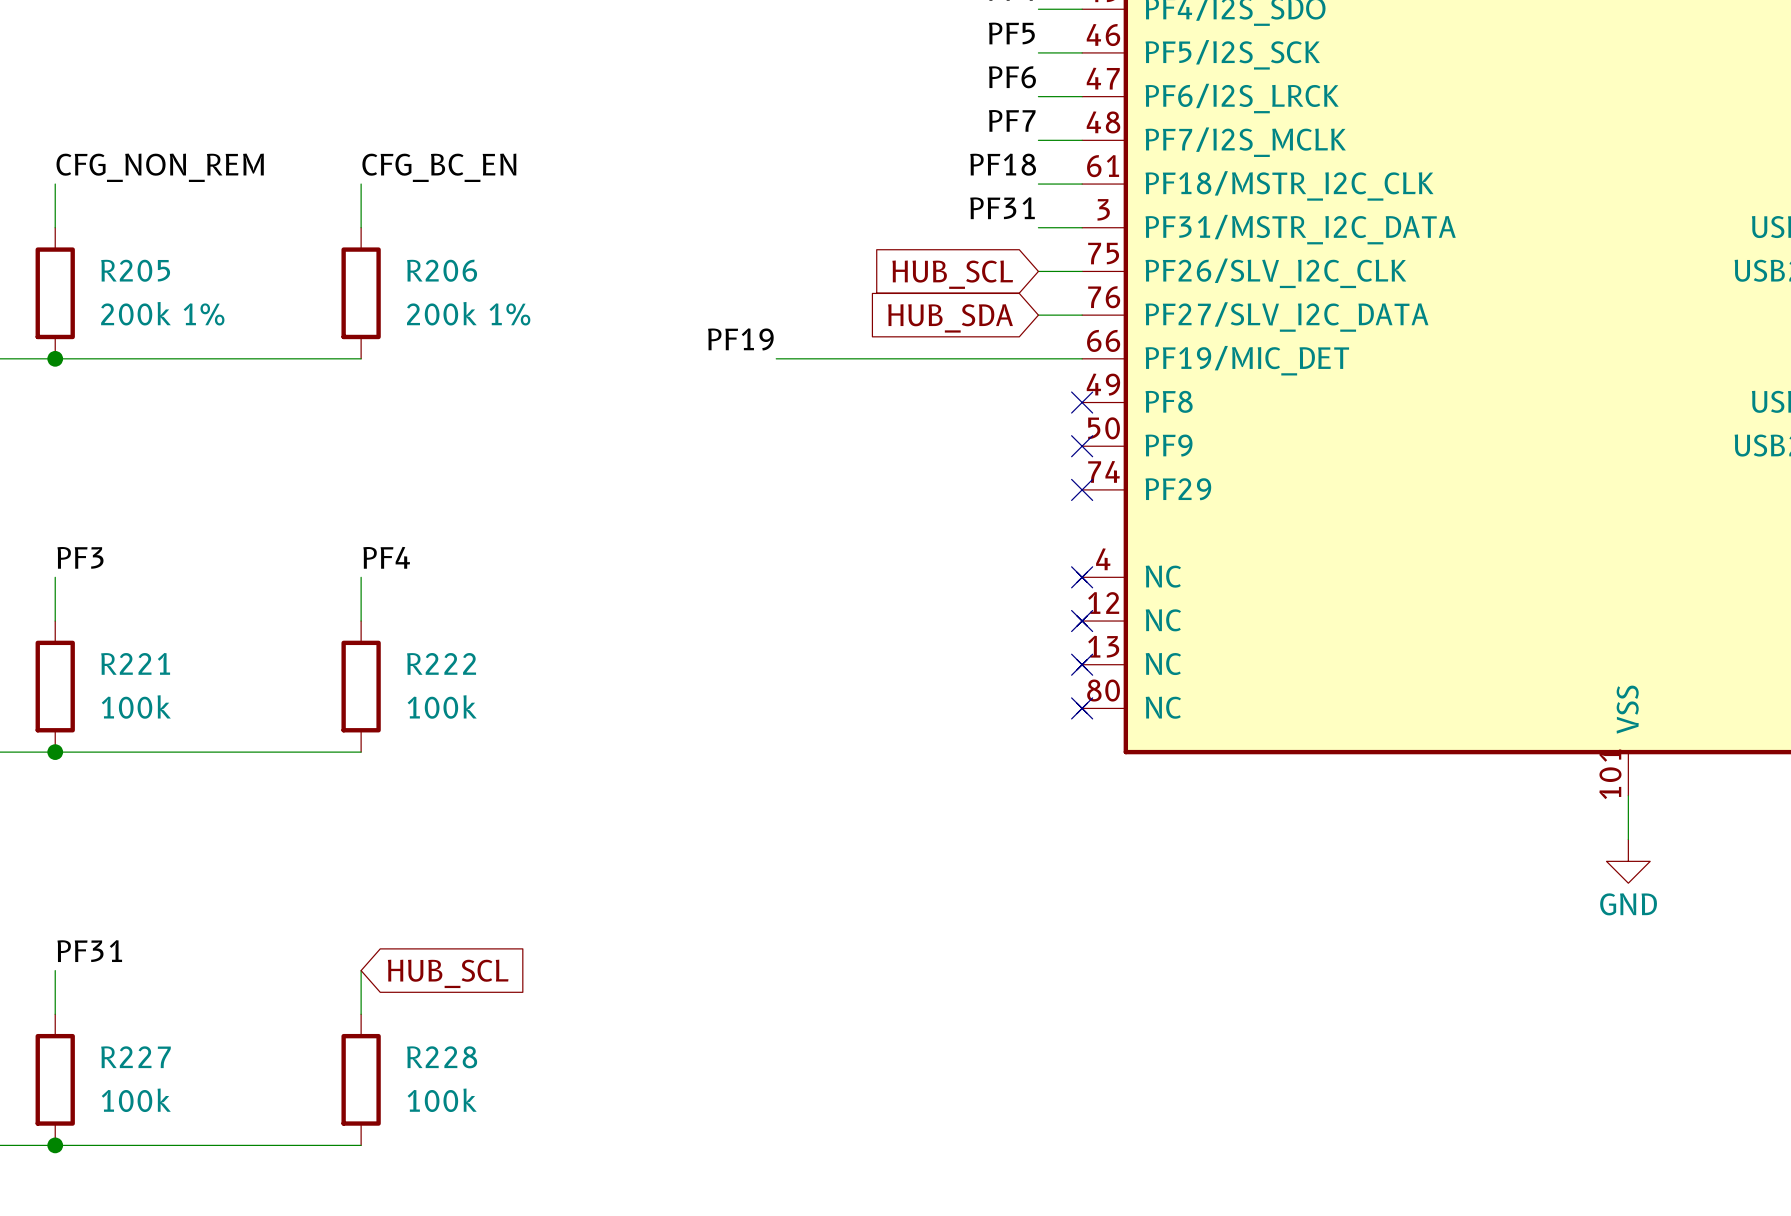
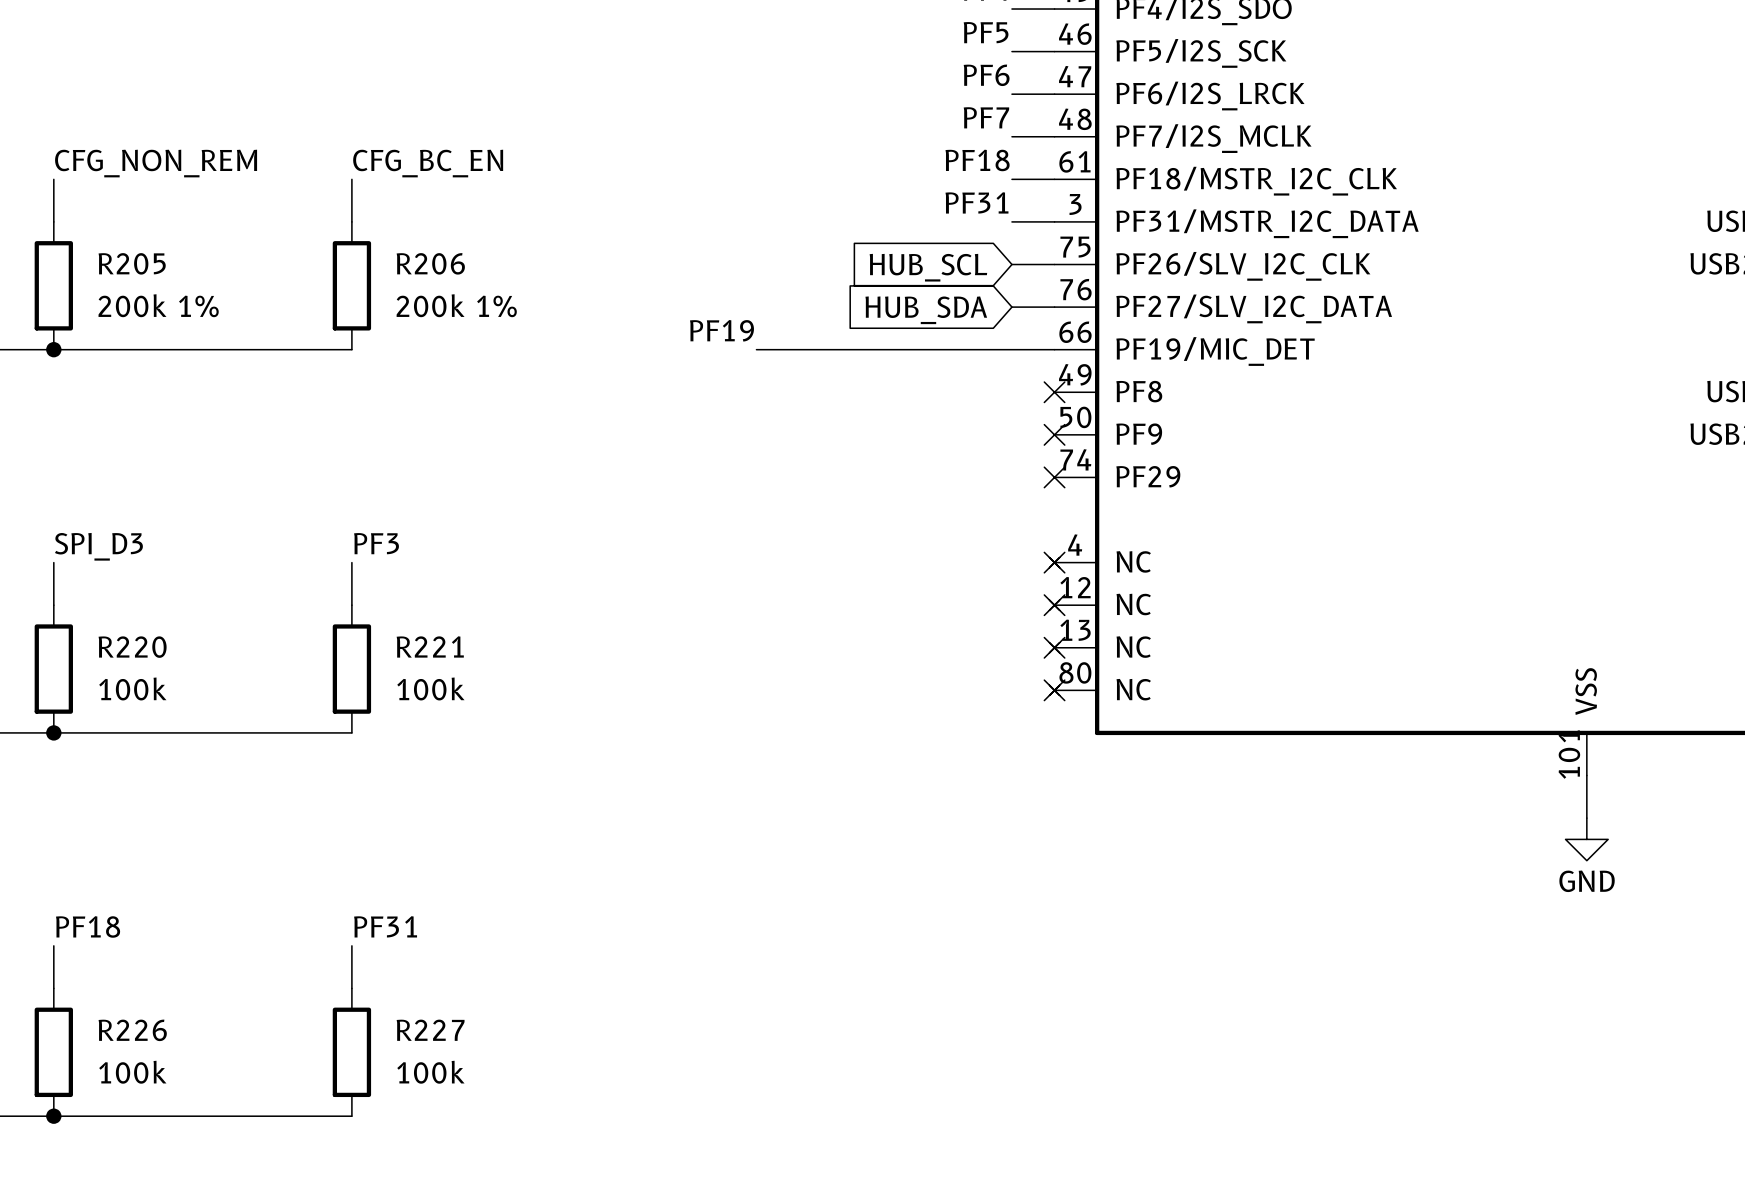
label: PF3 (80, 557) -> SPI_D3 (98, 546)
label: PF4 (386, 557) -> PF3 (376, 543)
R221 name: R221 (135, 663) -> R220 (132, 647)
R222 name: R222 (441, 663) -> R221 (430, 646)
label: PF31 (89, 951) -> PF18 (88, 926)
label: none -> PF31 (385, 926)
global label: HUB_SCL (448, 973) -> none
R227 name: R227 (135, 1057) -> R226 (132, 1030)
R228 name: R228 (442, 1057) -> R227 (430, 1030)

